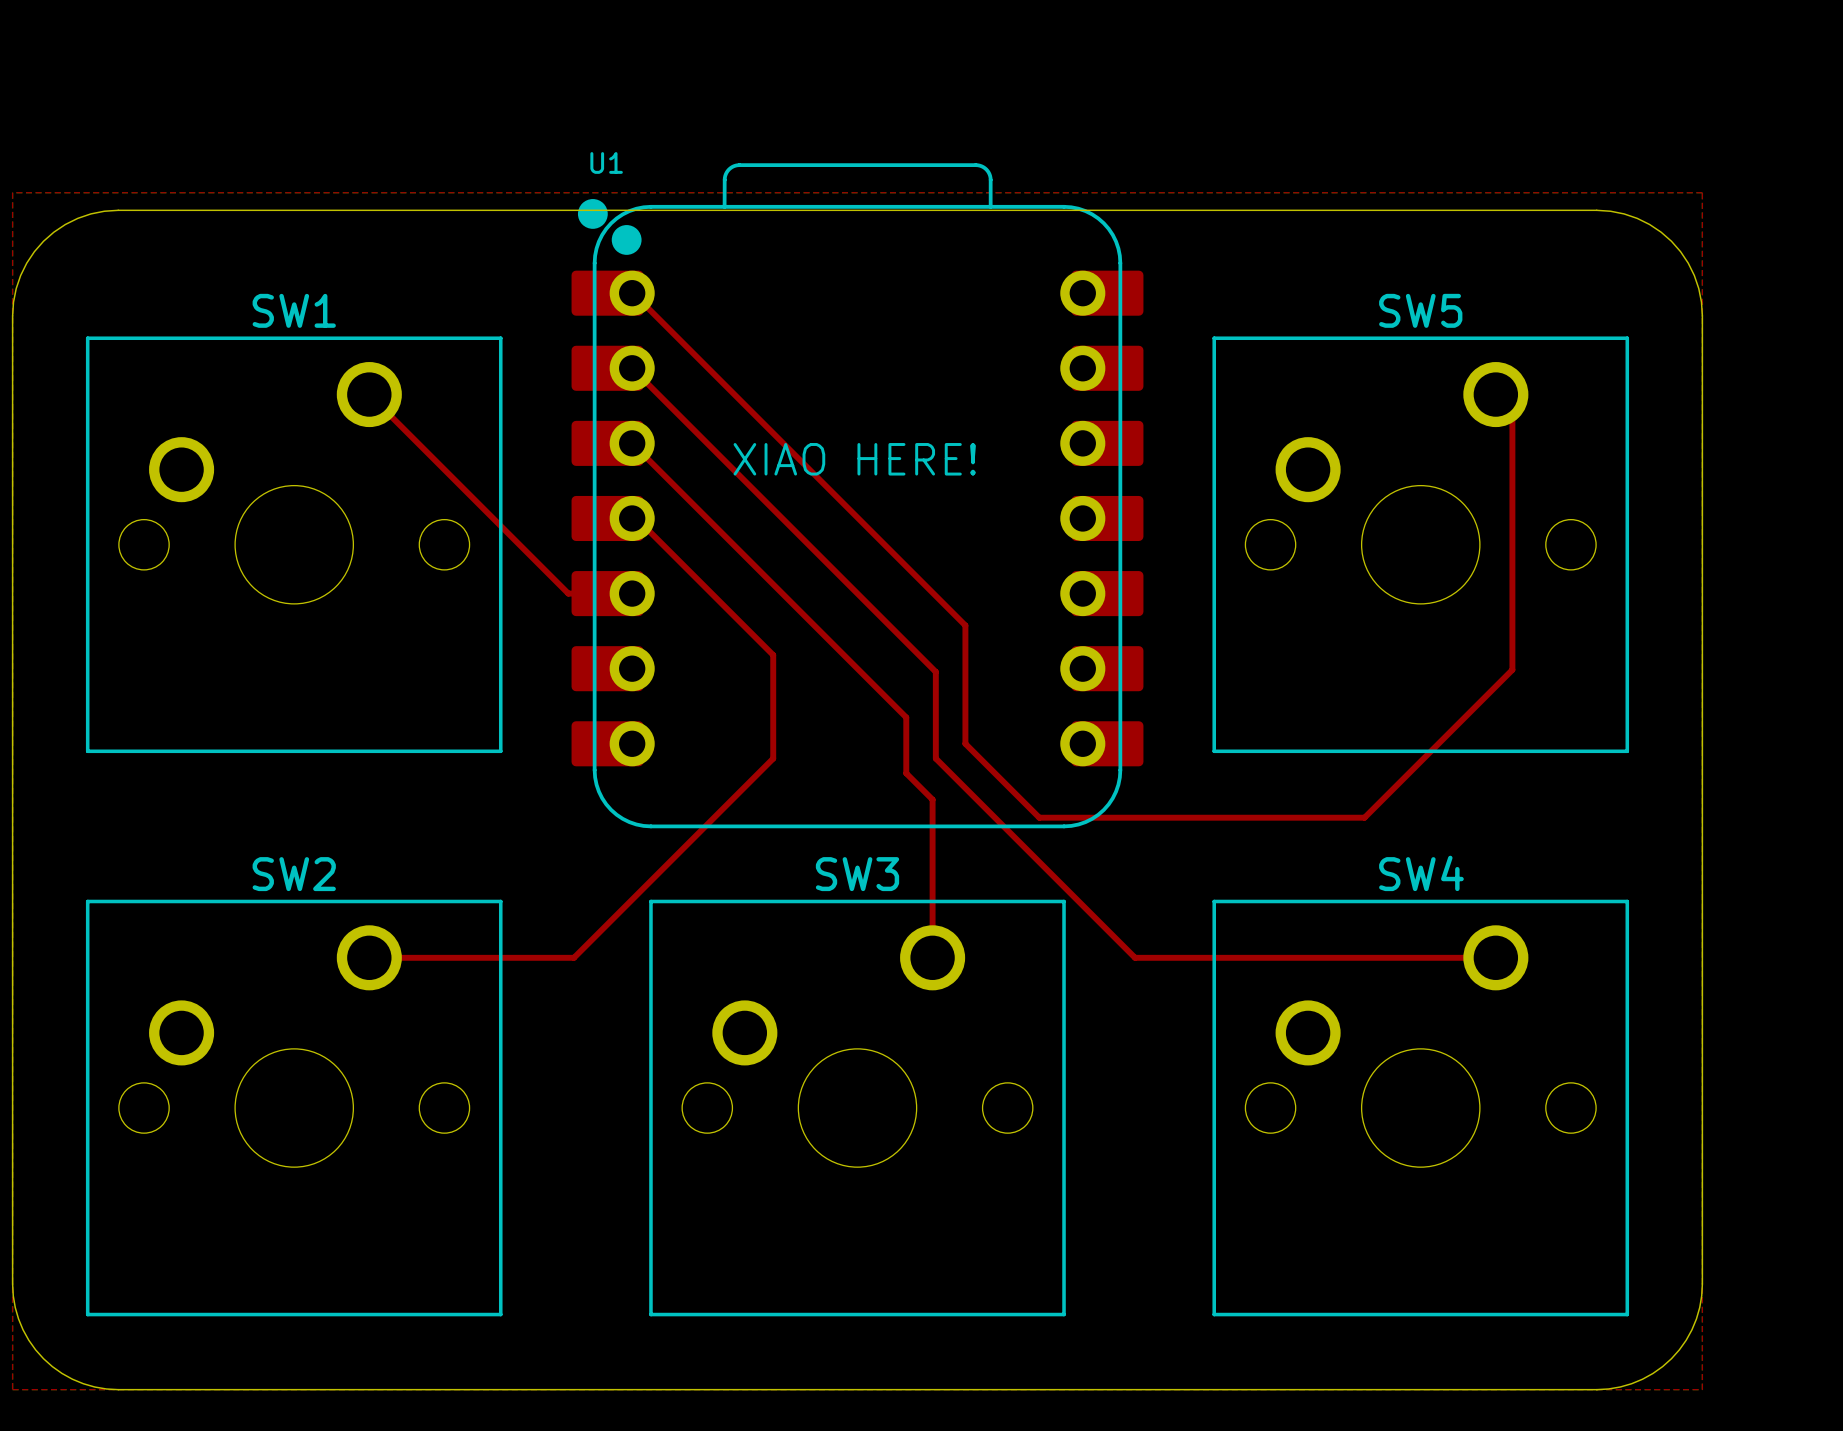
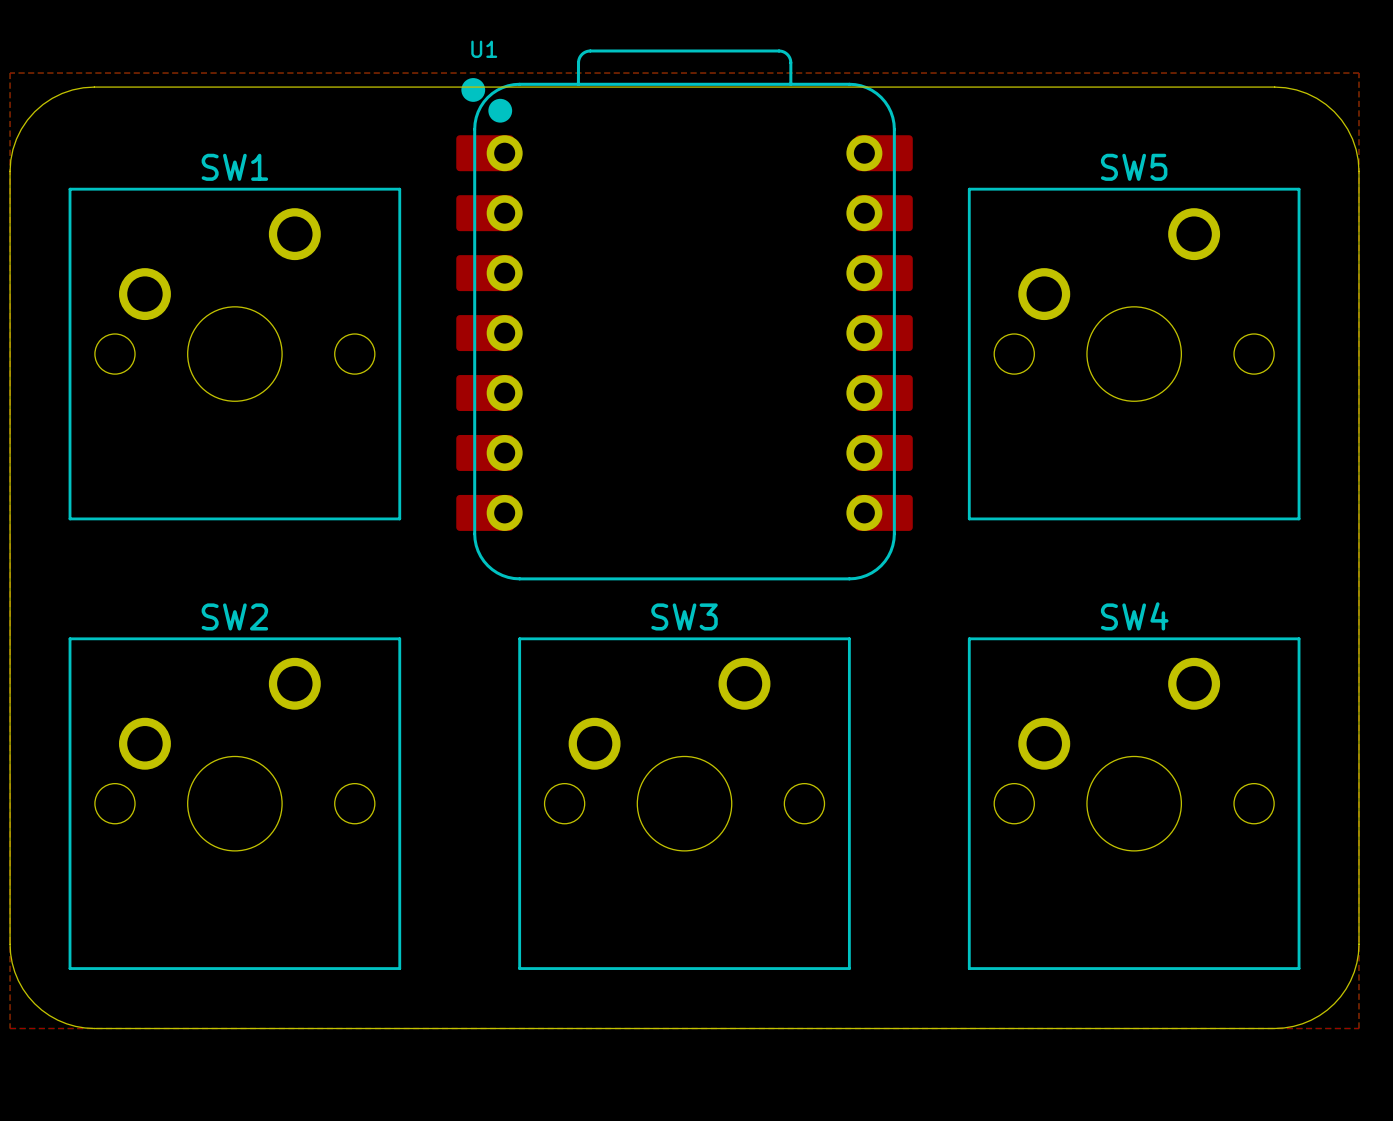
top track: (607, 293) (633, 293) (965, 625) (965, 743) (1039, 817) (1364, 817) (1512, 669) (1512, 411) (1495, 394) -> none
top track: (632, 368) (935, 671) (935, 758) (1135, 957) (1495, 957) -> none
top track: (369, 394) (568, 593) (632, 593) -> none
top track: (632, 443) (906, 717) (906, 773) (932, 799) (932, 957) -> none
text: XIAO HERE! (854, 459) -> none
top track: (632, 518) (636, 518) (773, 655) (773, 758) (573, 957) (369, 957) -> none

